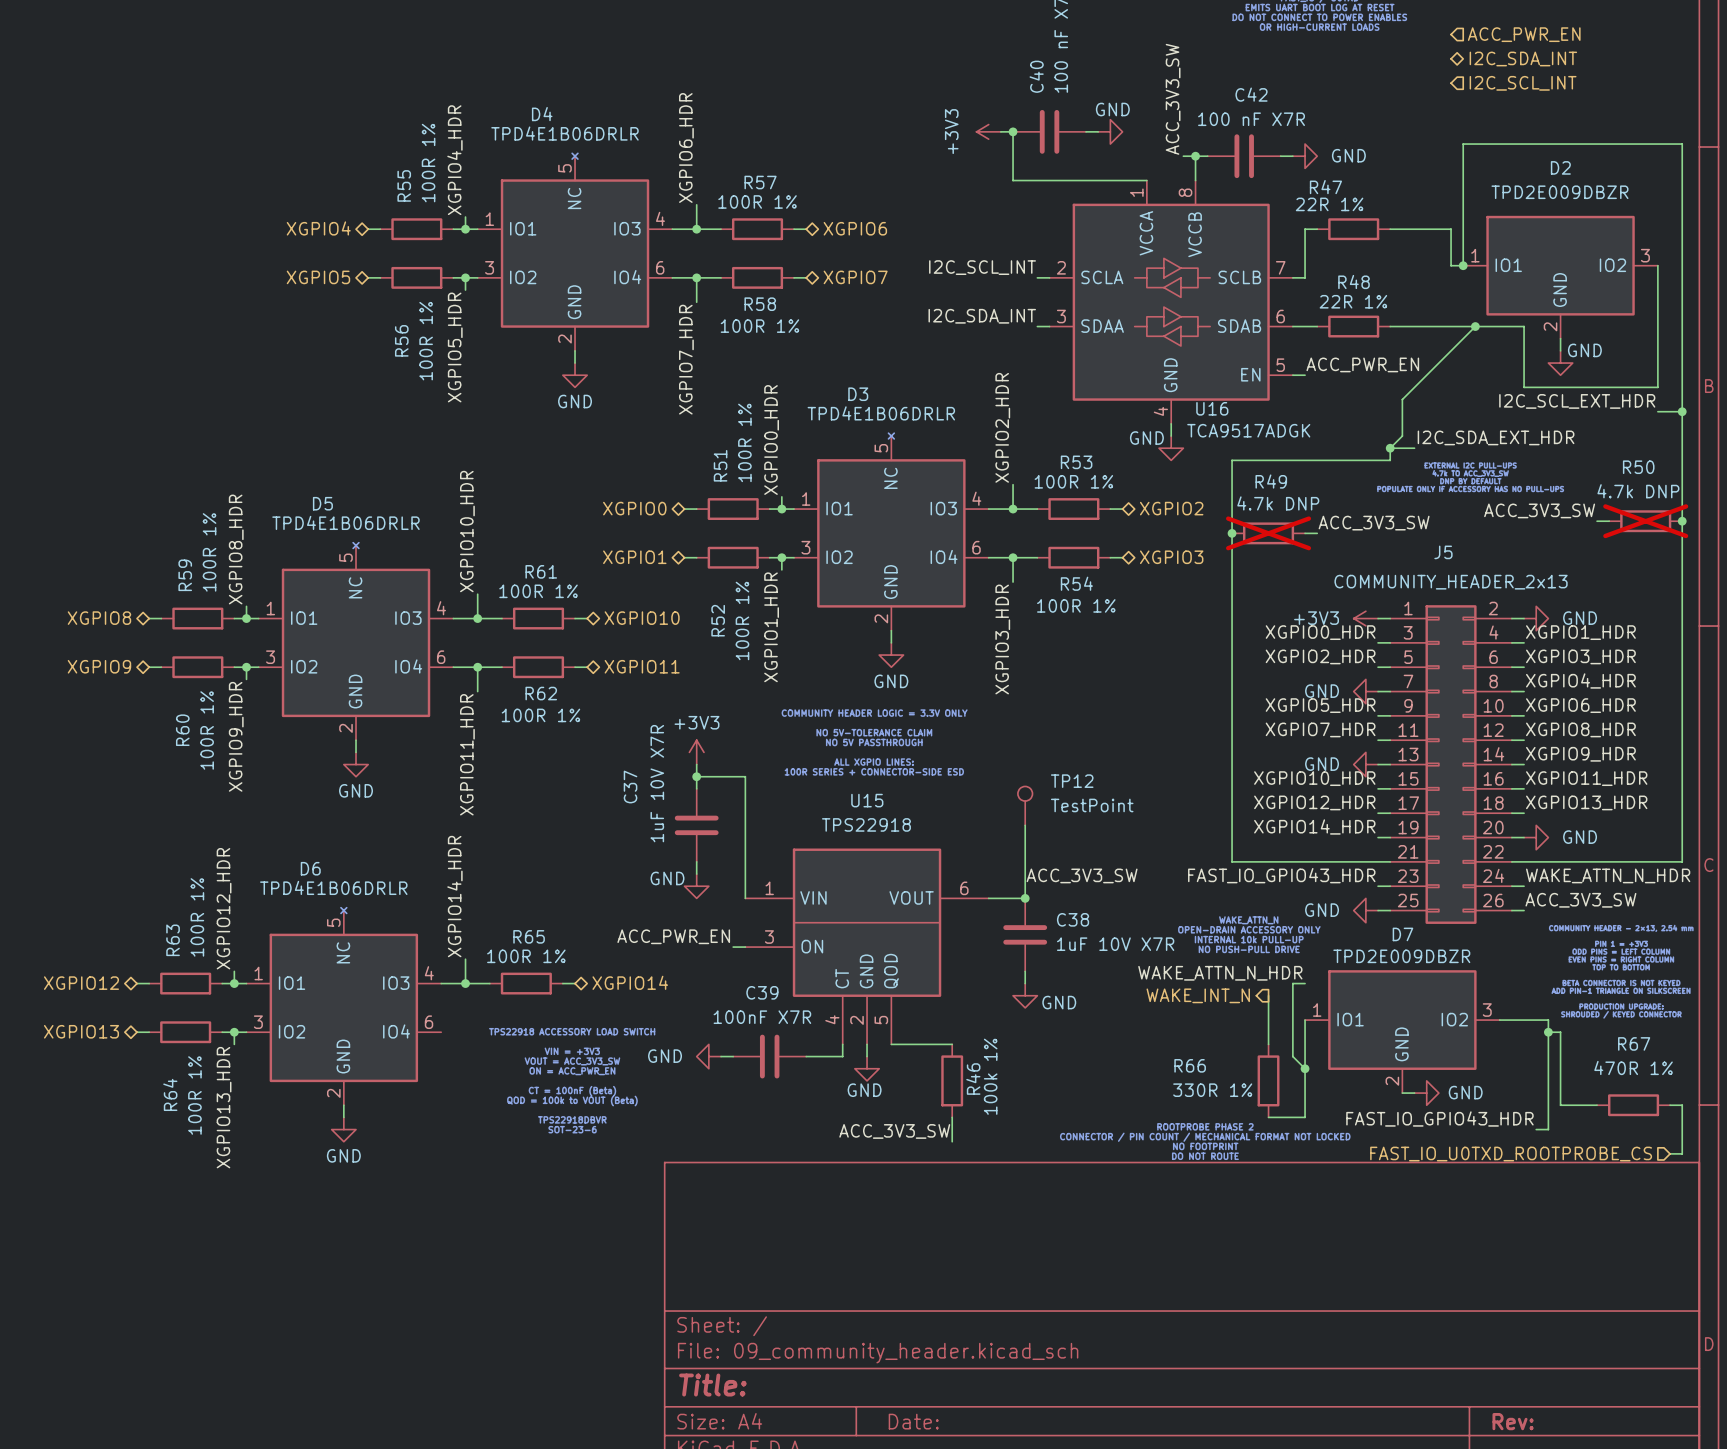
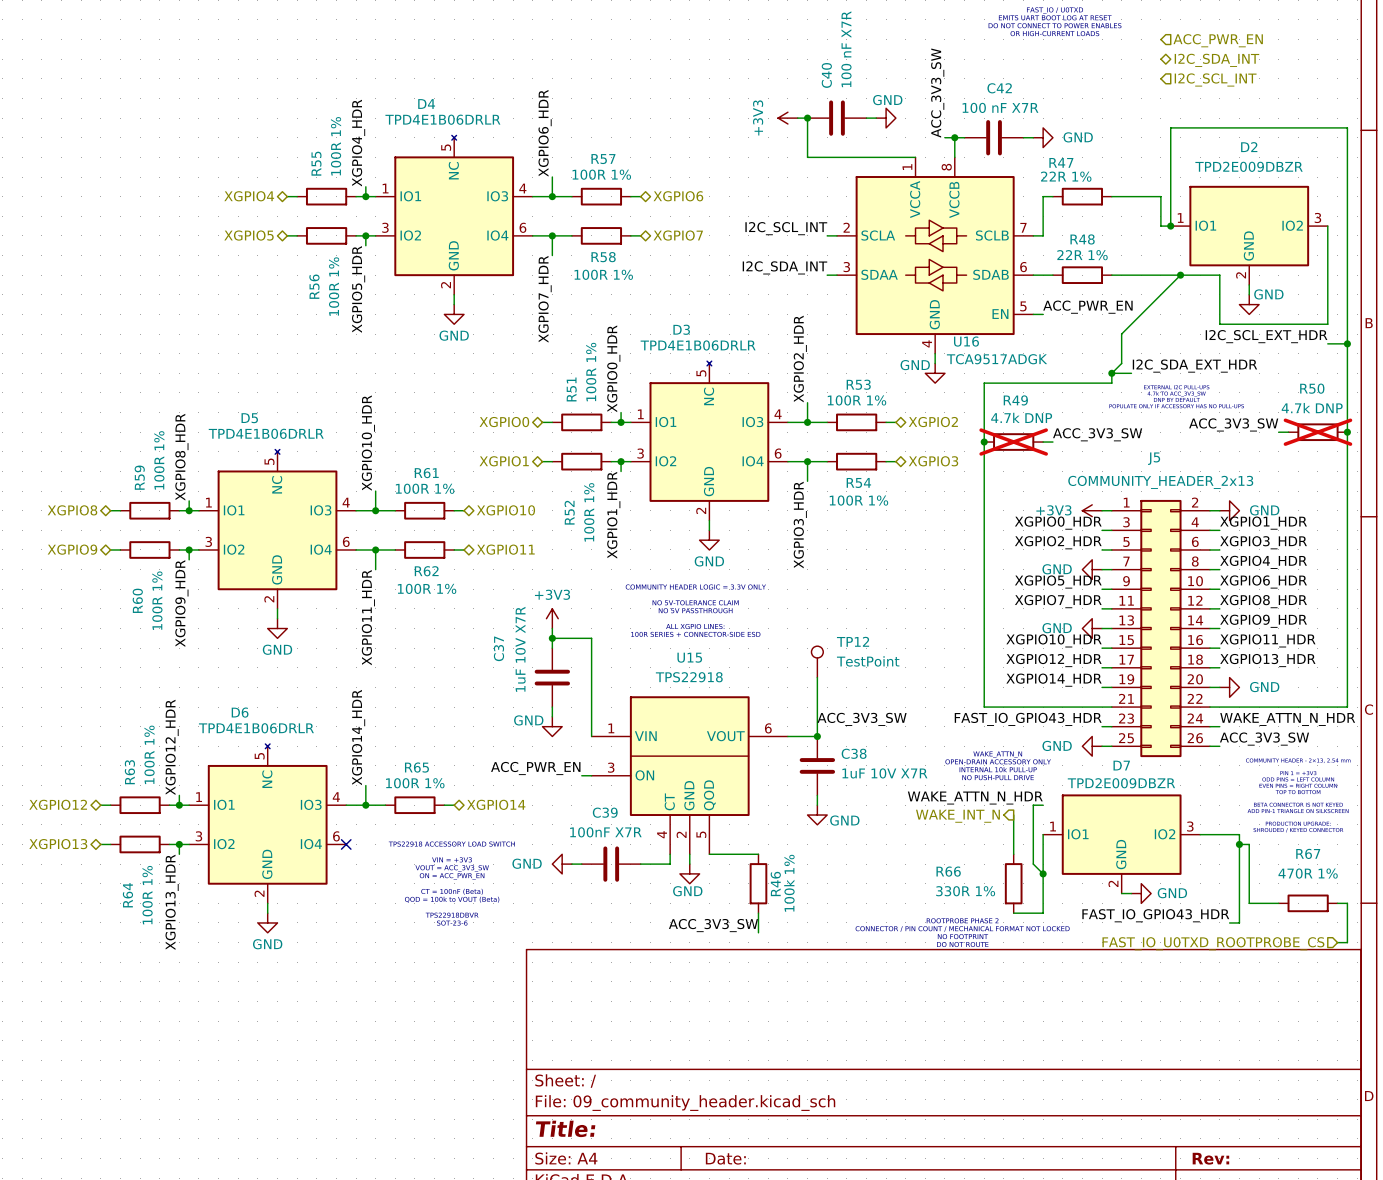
no-connect mark: none -> (346, 844)

